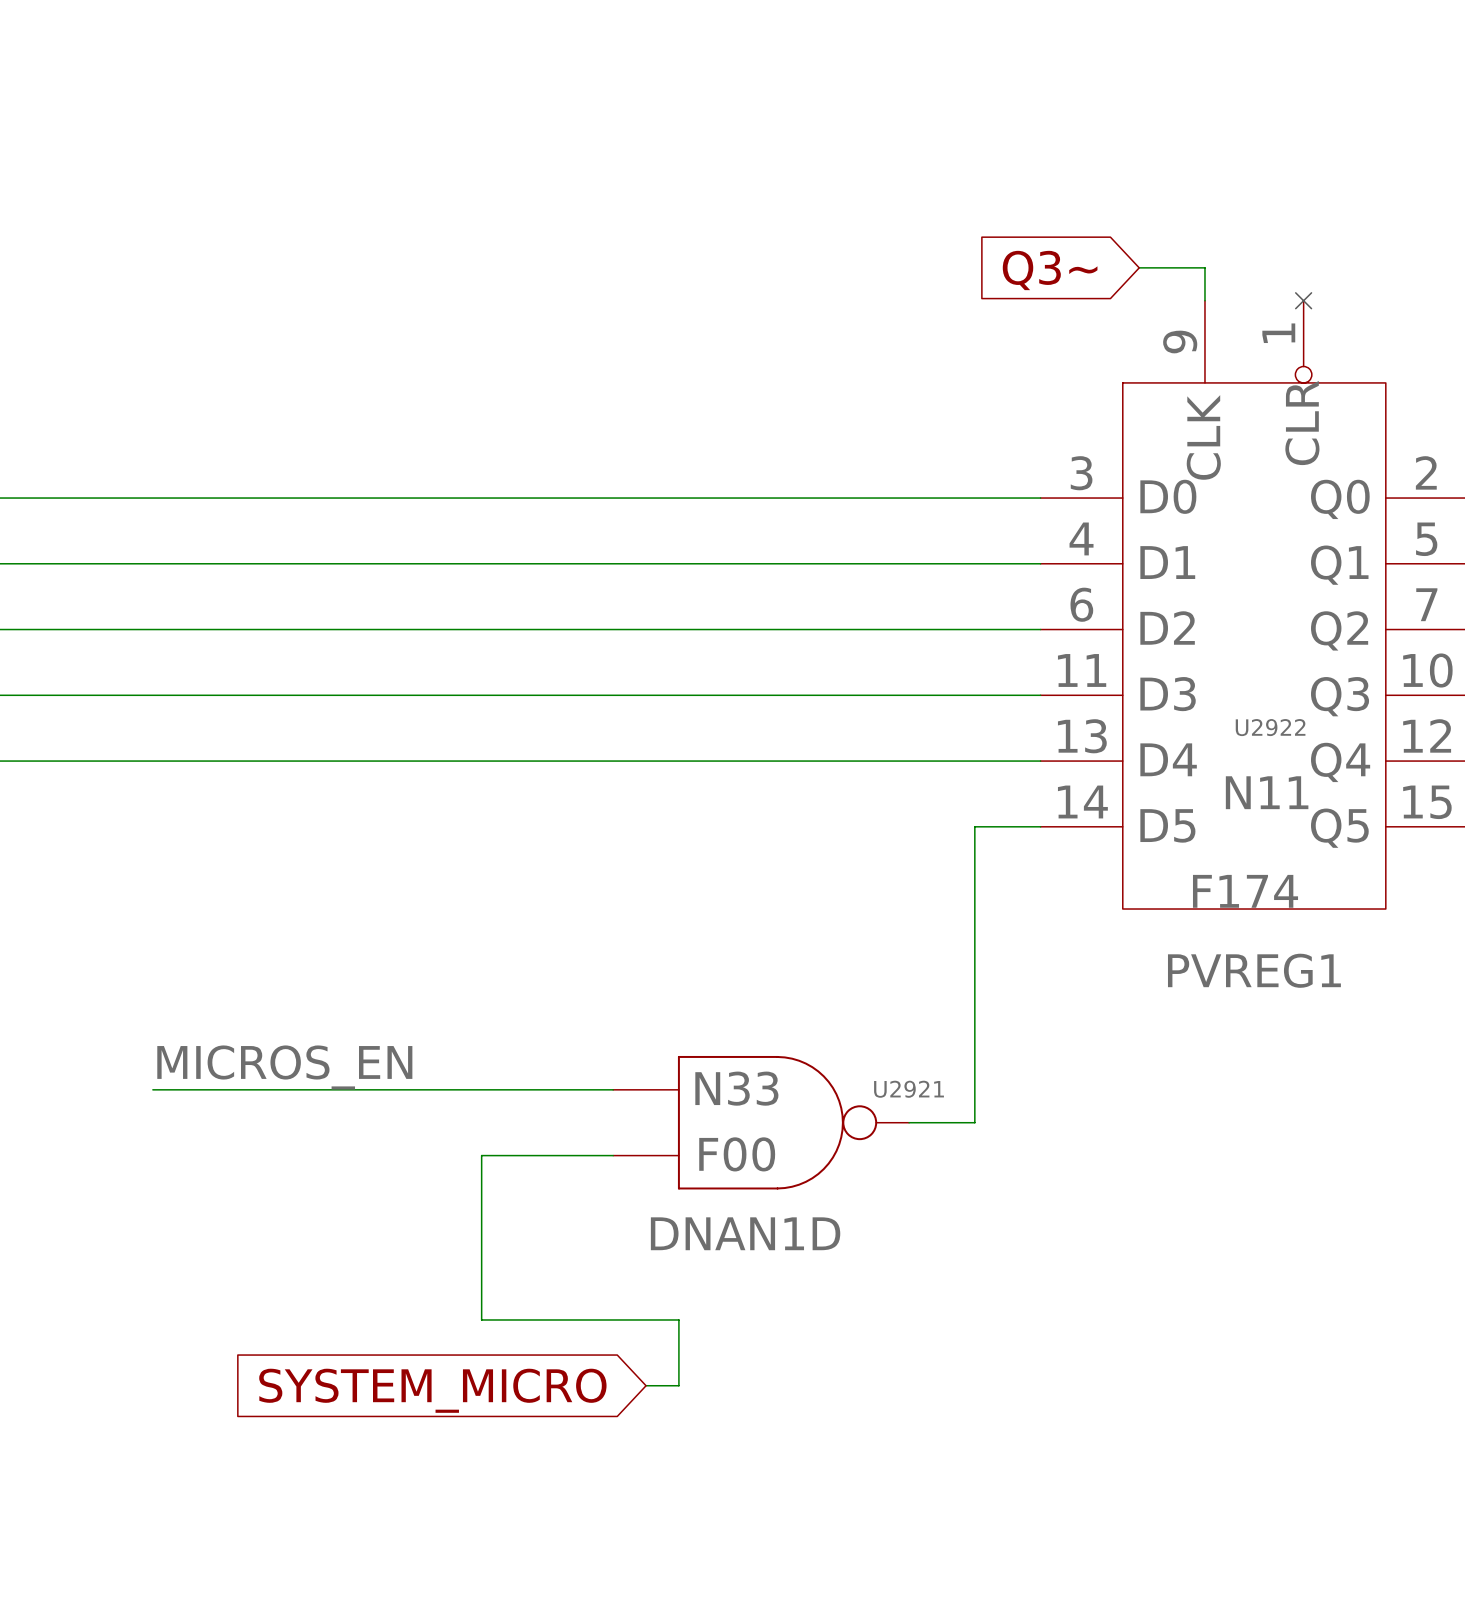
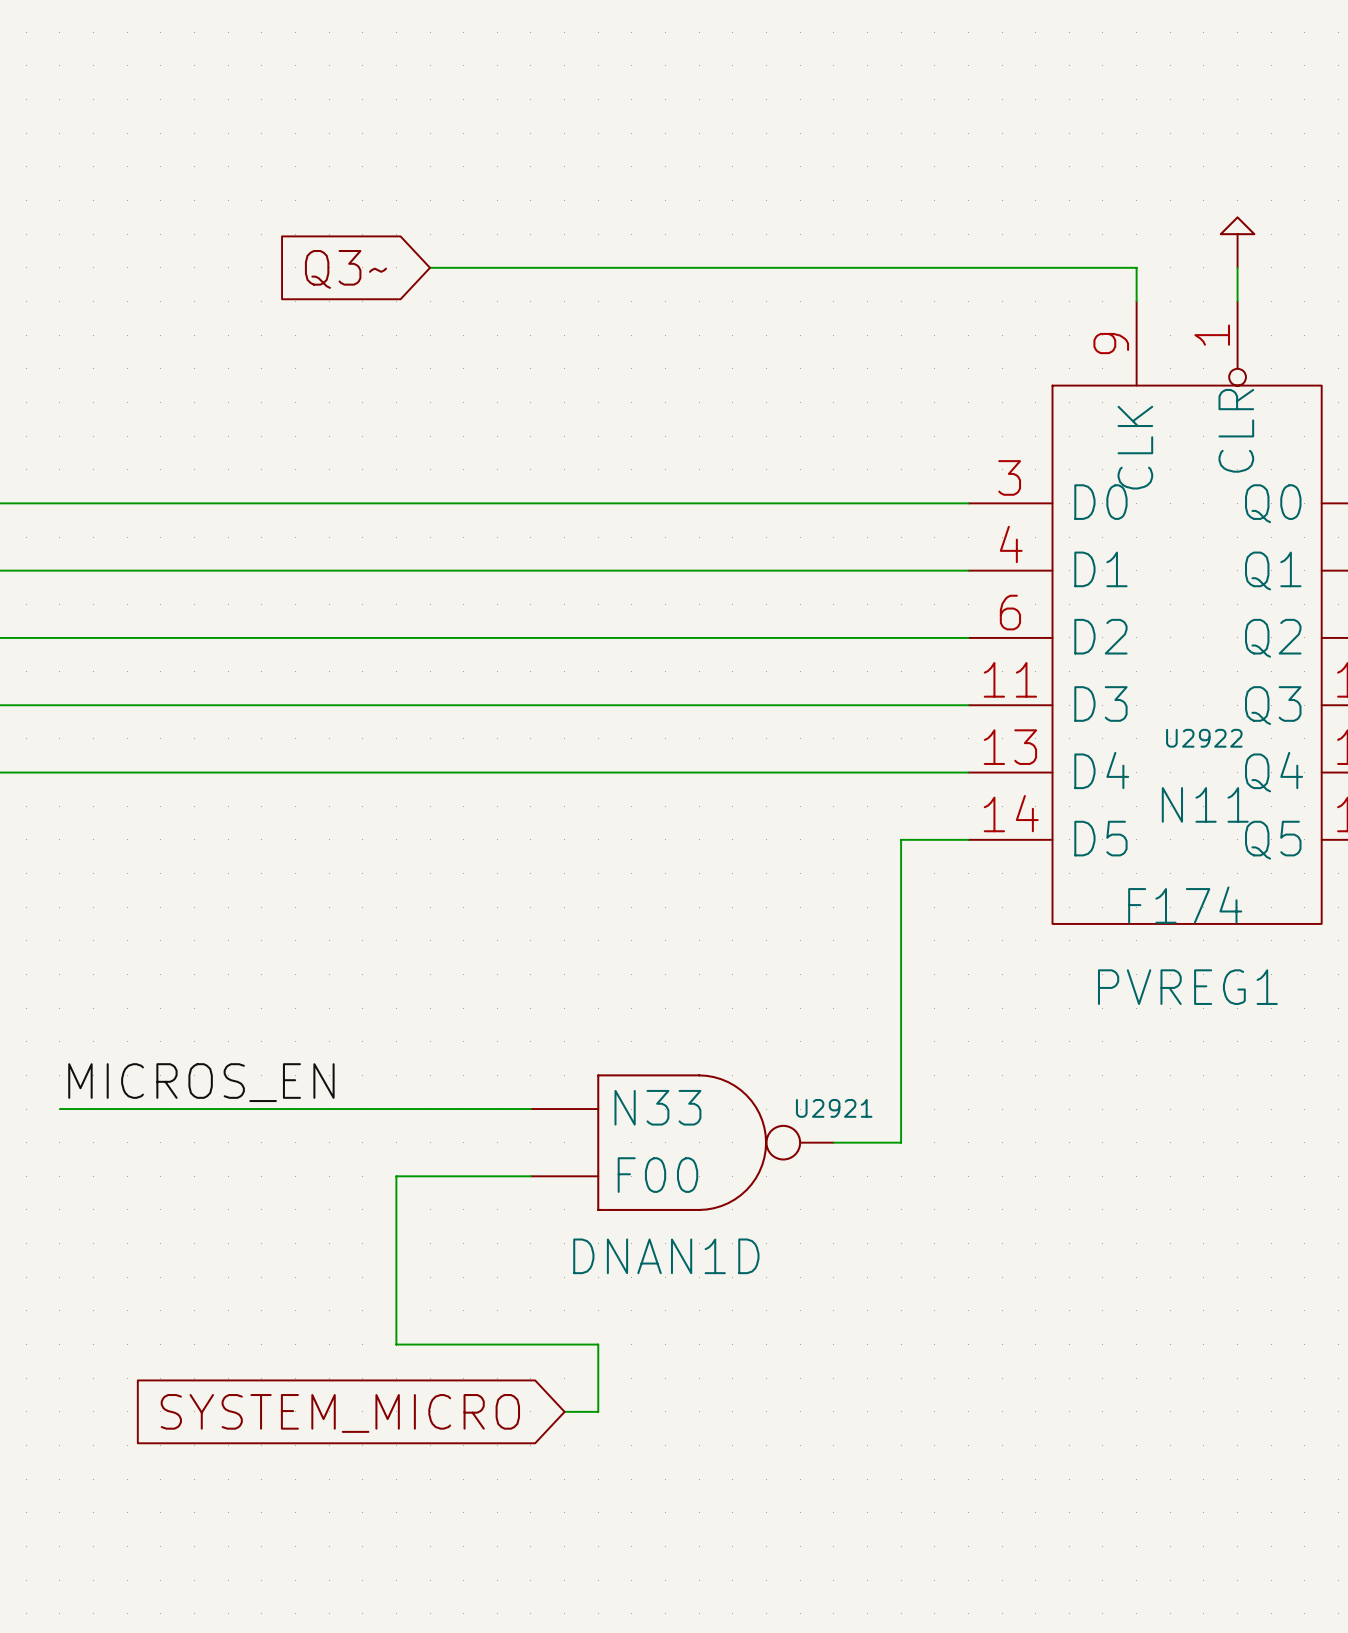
power symbol: none -> (1237, 242)
wire: none -> (430, 267) (1069, 267)
wire: none -> (1237, 267) (1237, 301)
global label: none -> Q3~ (345, 269)
global label: Q3~ (1050, 270) -> none
no-connect mark: (1303, 300) -> none

